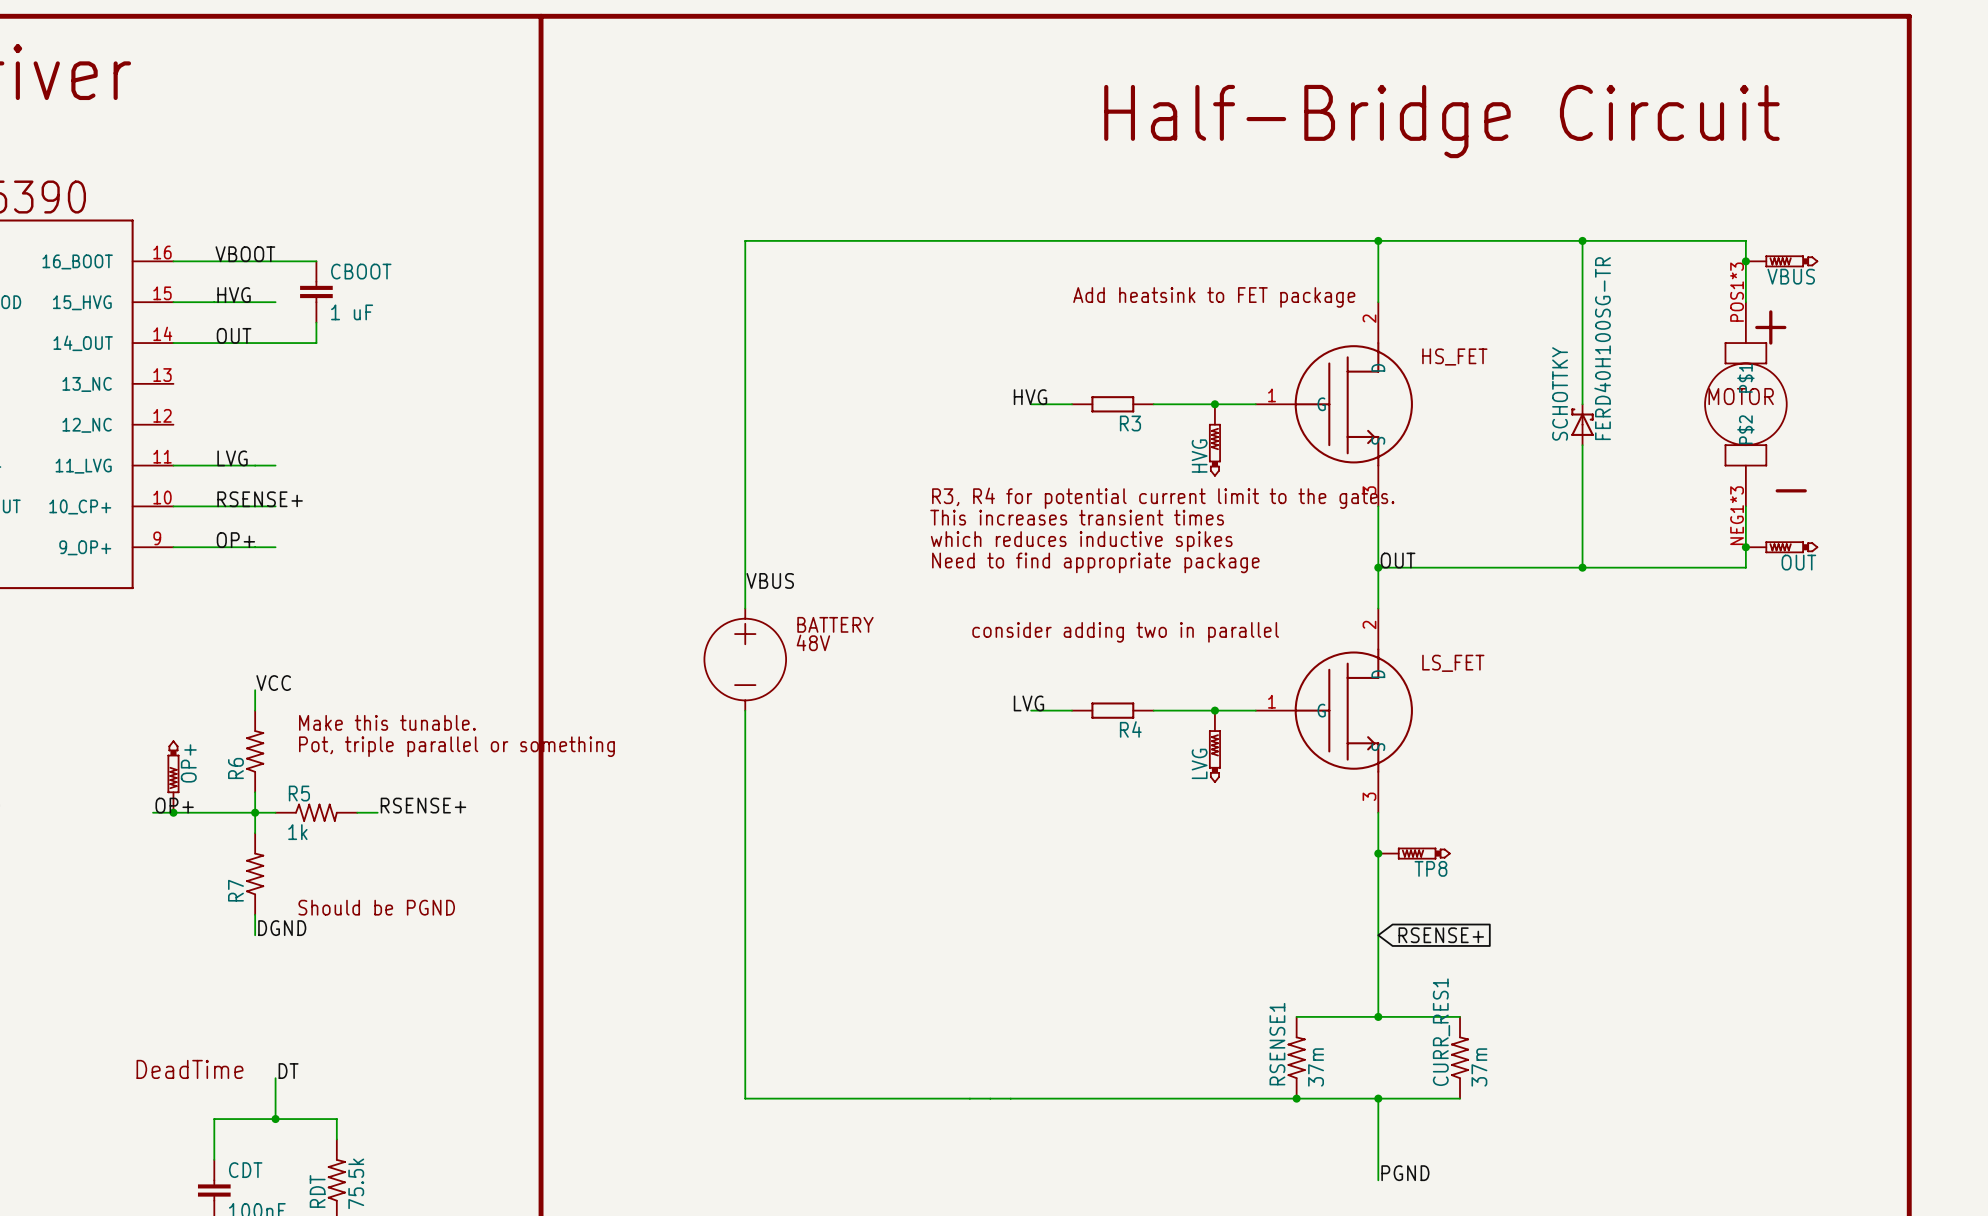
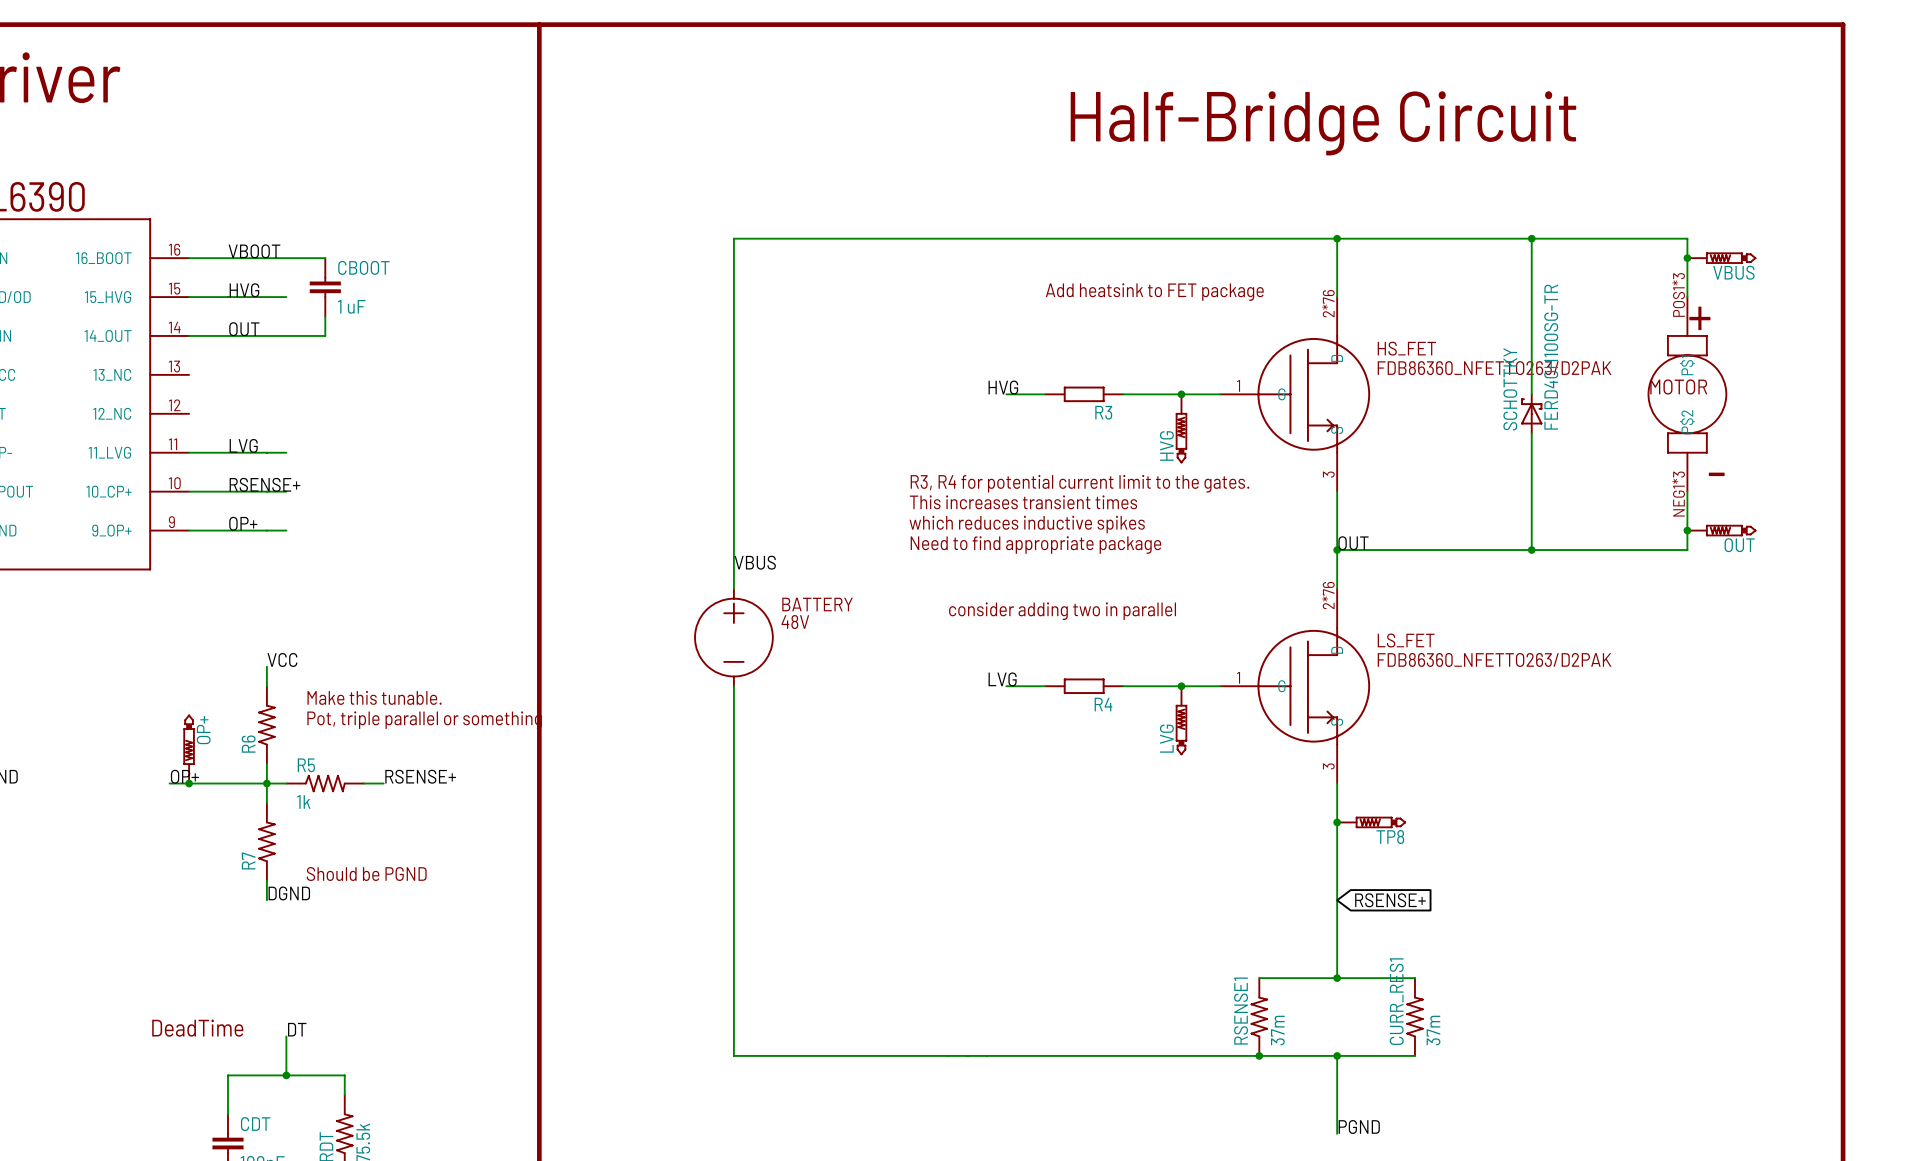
HS_FET pin number: 2 (1369, 318) -> 2*76 (1328, 303)
HS_FET value: none -> FDB86360_NFETTO263/D2PAK (1494, 368)
LS_FET pin number: 2 (1369, 624) -> 2*76 (1328, 595)
LS_FET value: none -> FDB86360_NFETTO263/D2PAK (1494, 659)

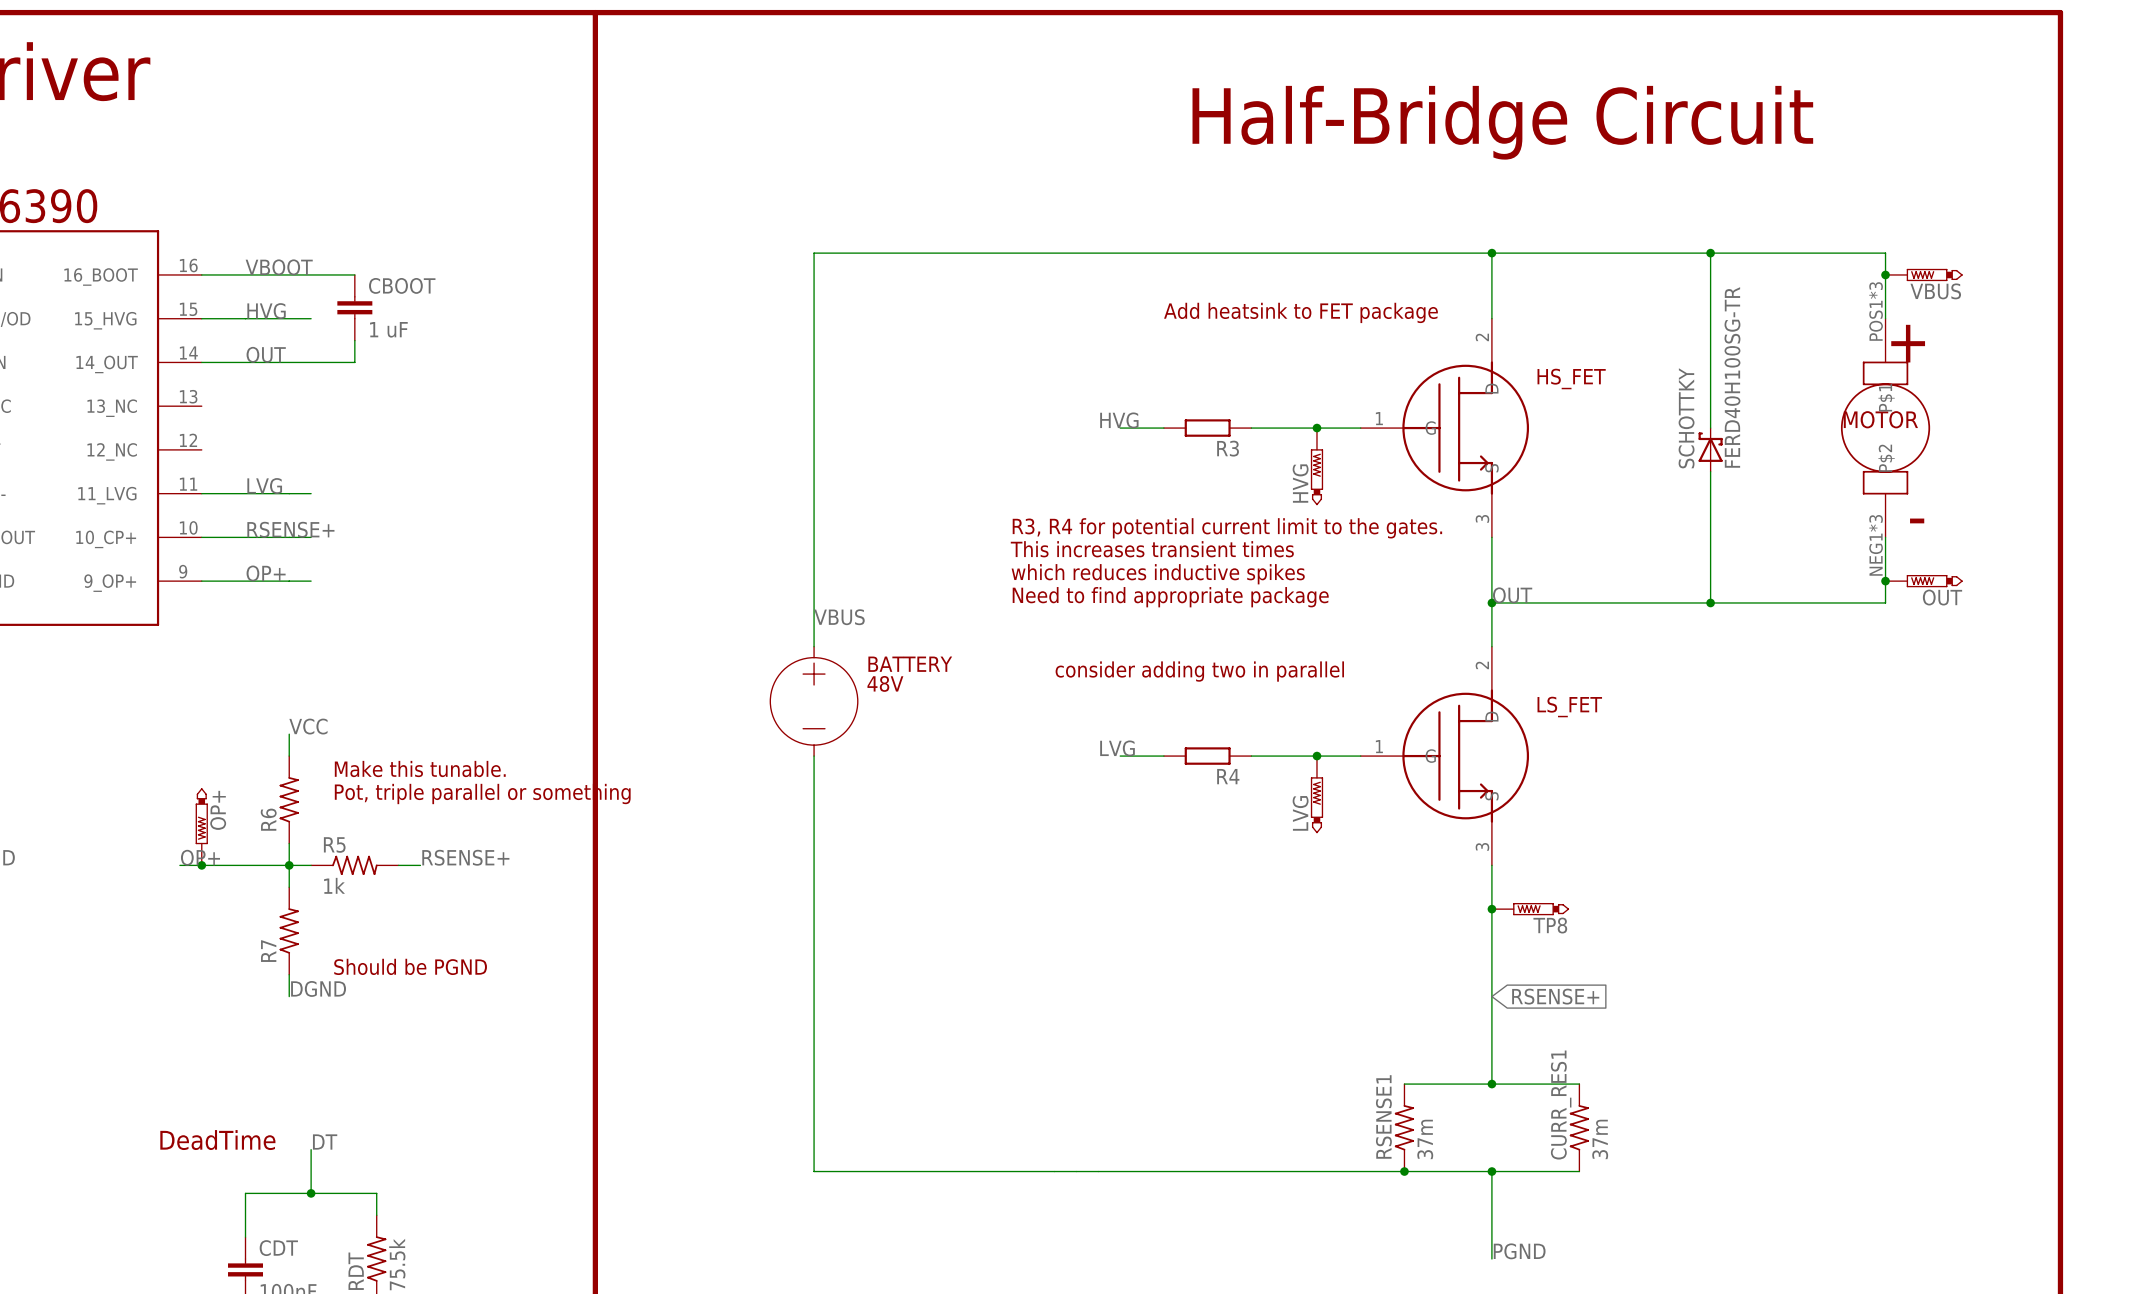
HS_FET pin number: 2*76 (1328, 303) -> 2 (1482, 337)
HS_FET value: FDB86360_NFETTO263/D2PAK (1494, 368) -> none
LS_FET pin number: 2*76 (1328, 595) -> 2 (1482, 665)
LS_FET value: FDB86360_NFETTO263/D2PAK (1494, 659) -> none

